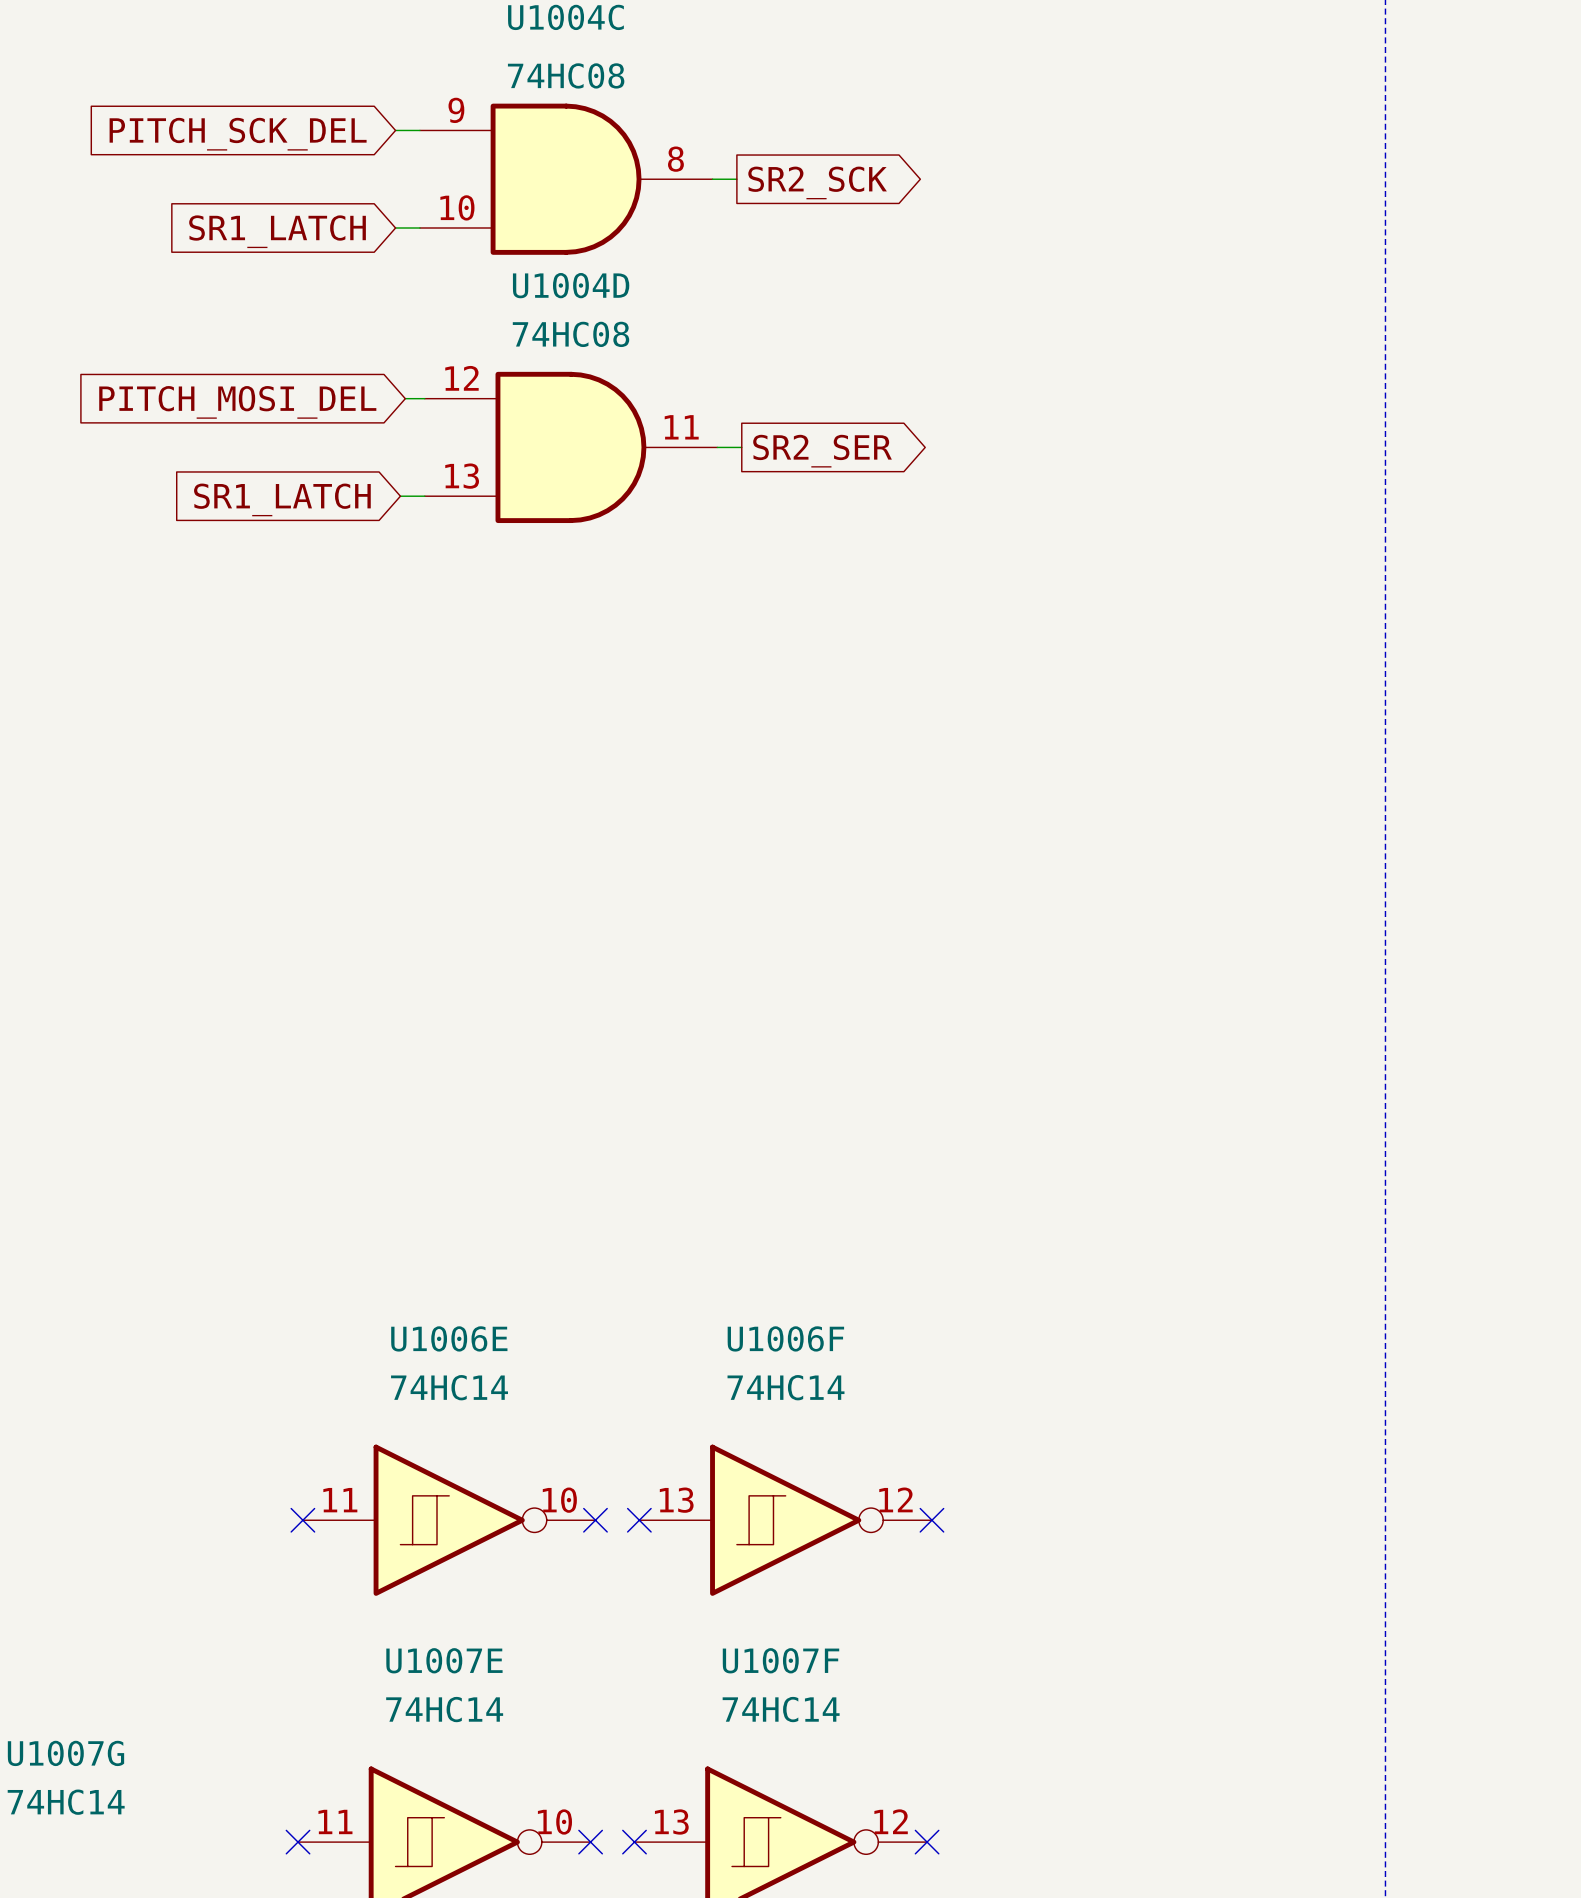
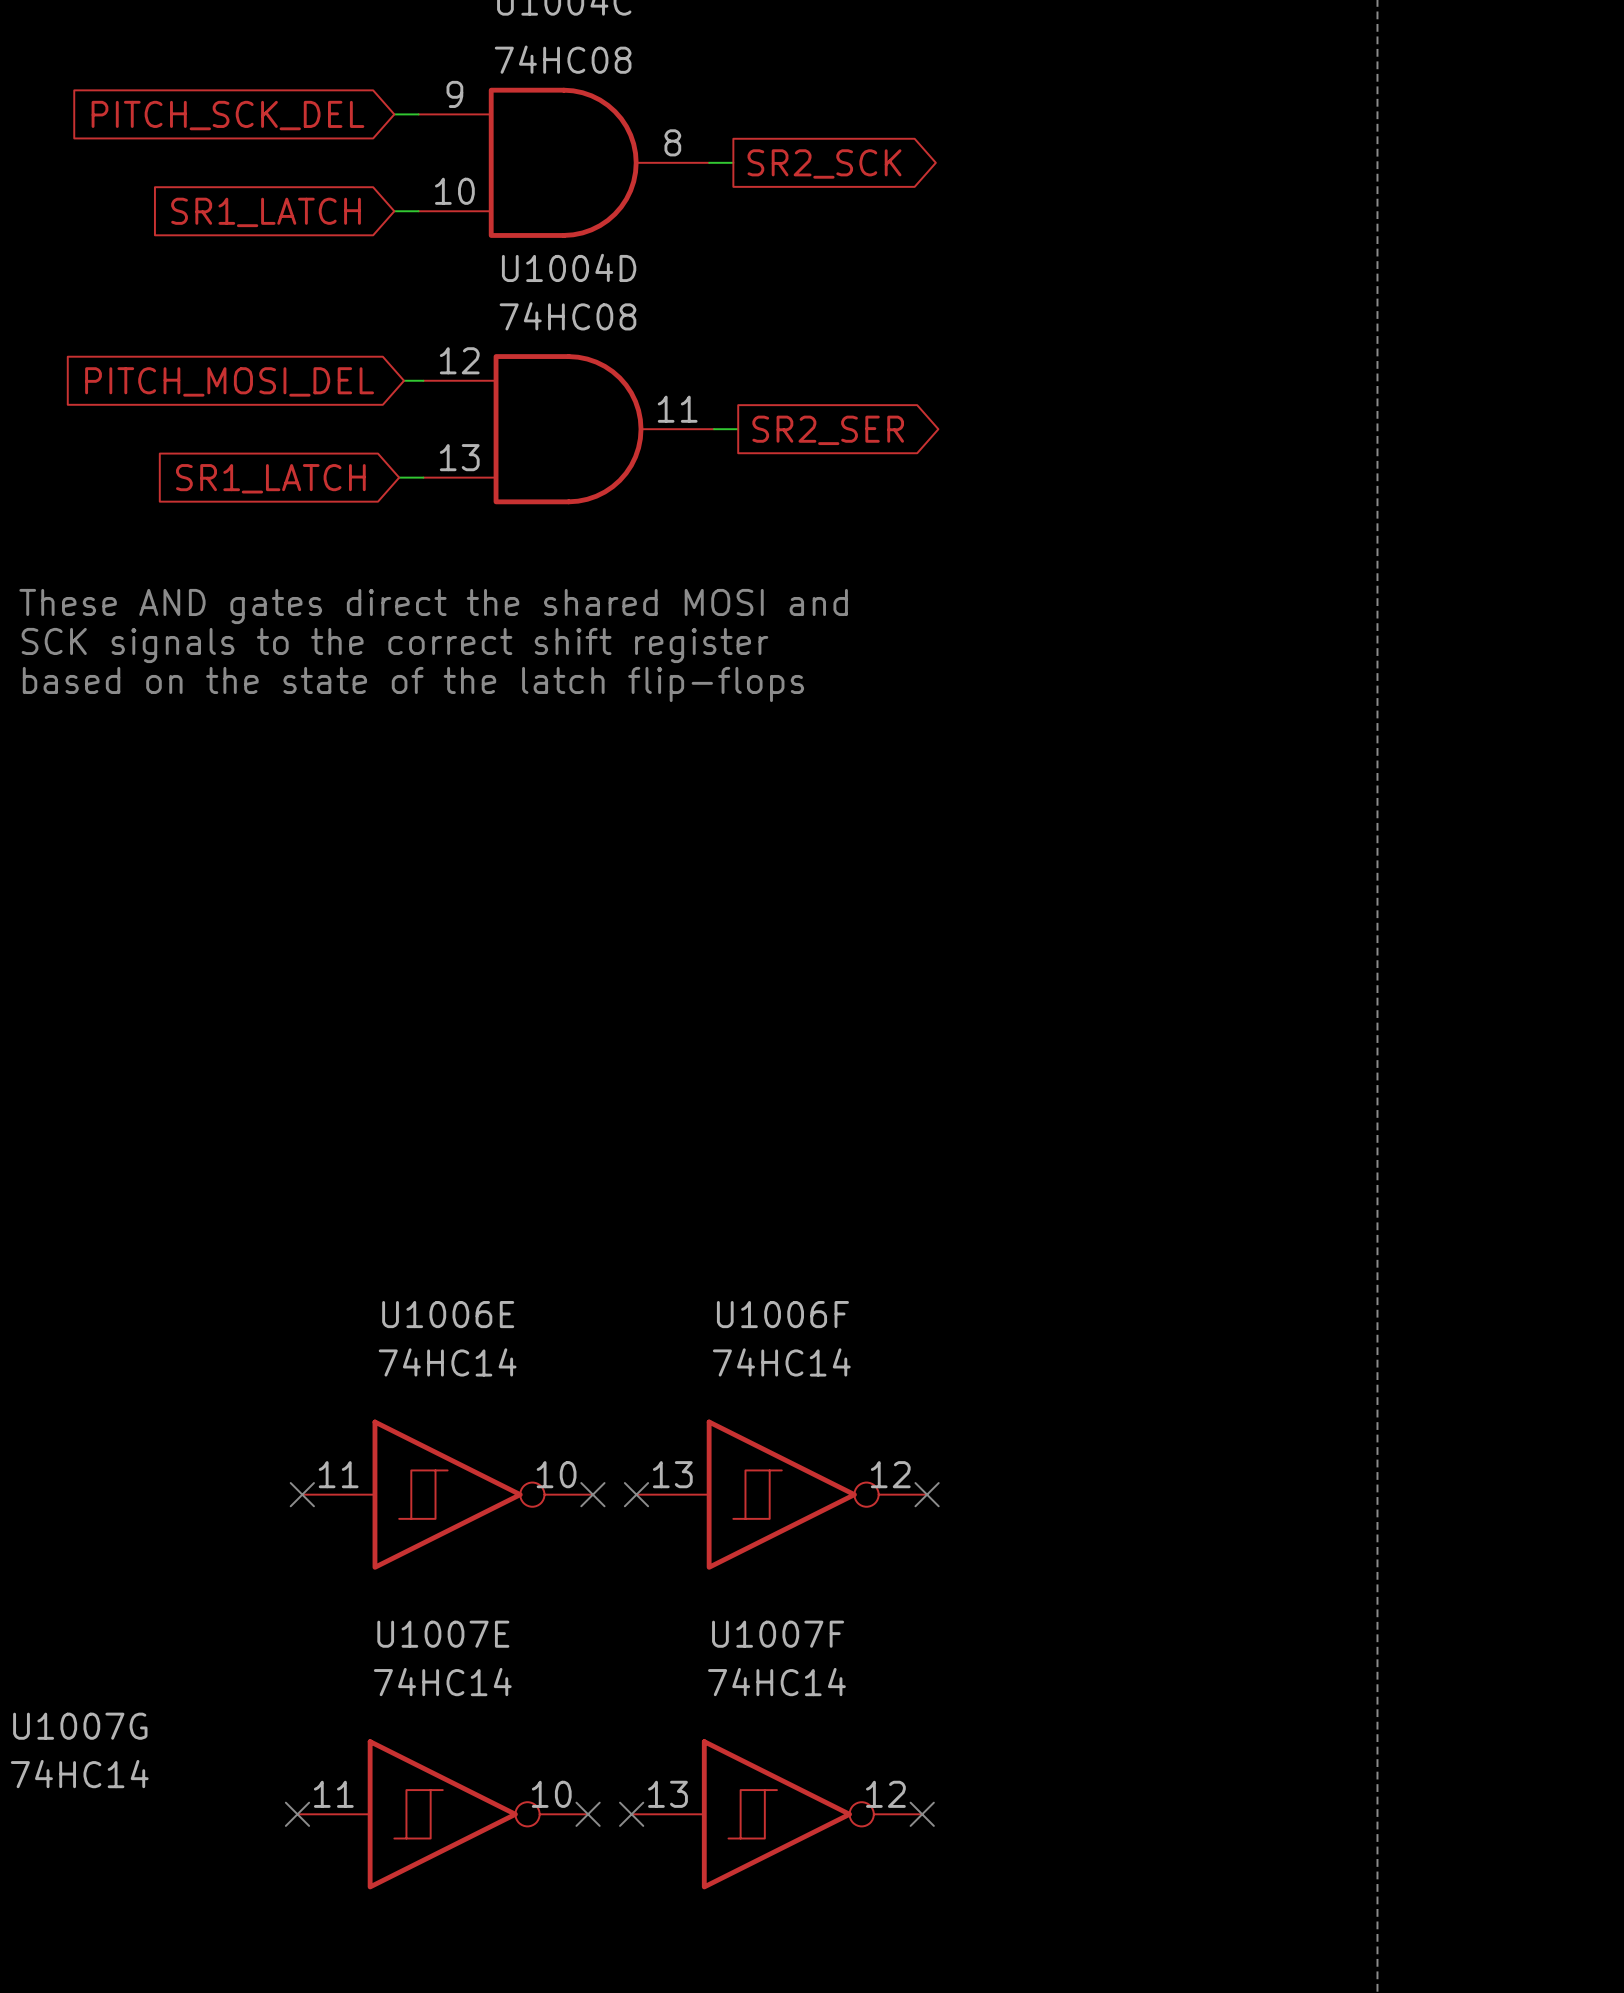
text: none -> These AND gates direct the shared MOSI and (433, 606)
text: none -> SCK signals to the correct shift register (394, 645)
text: none -> based on the state of the latch flip-flops (413, 684)

